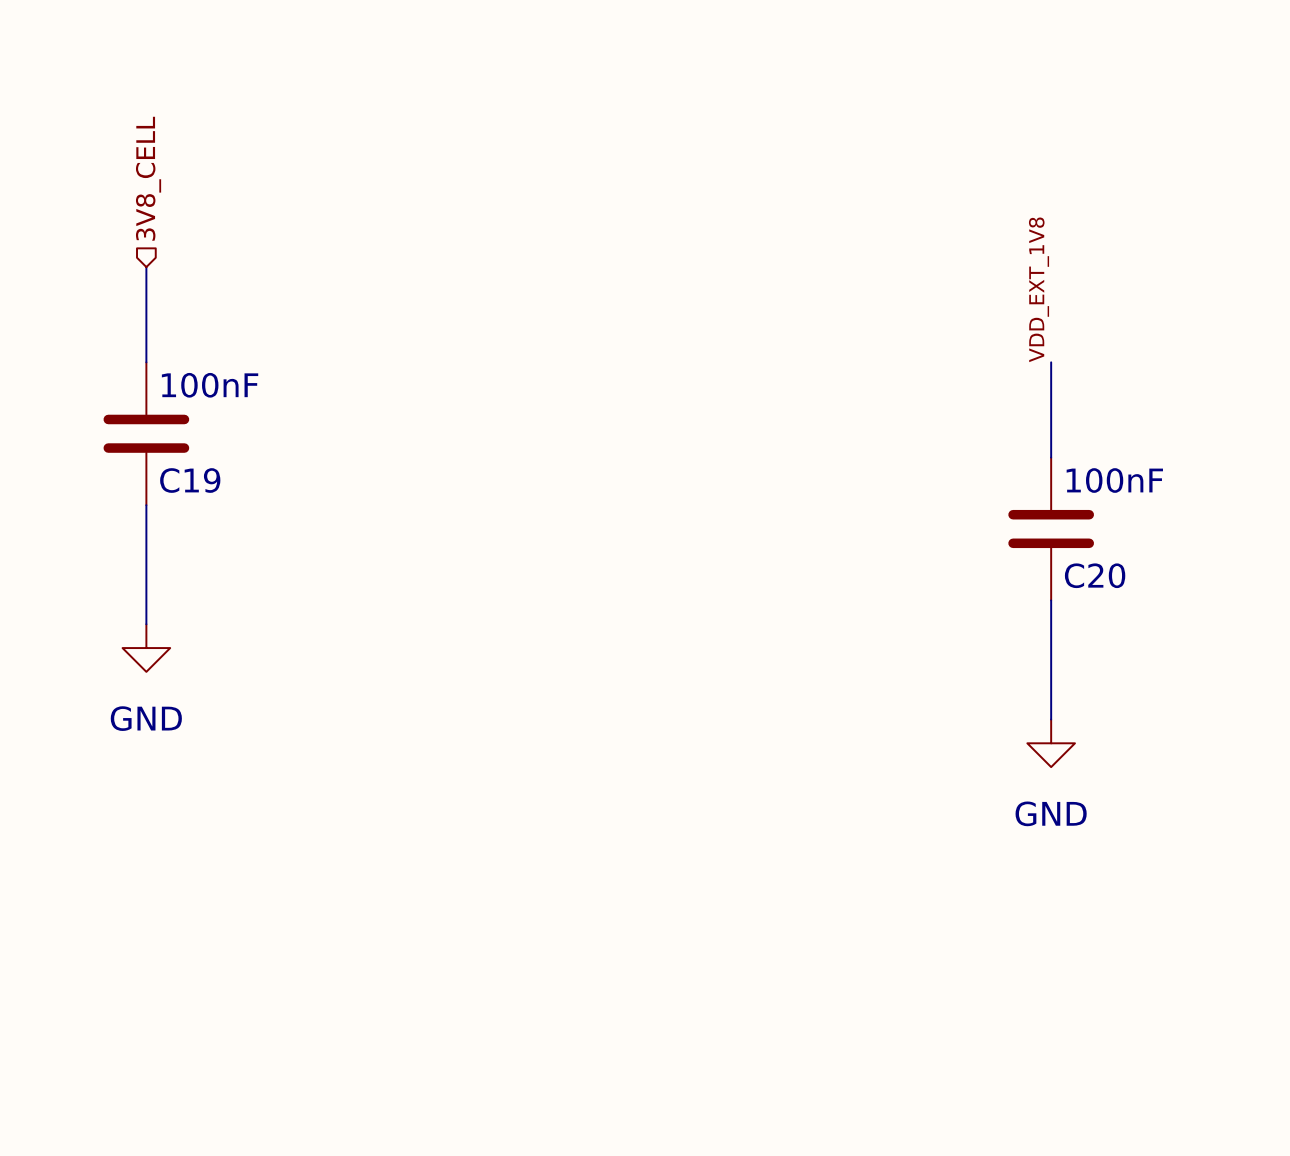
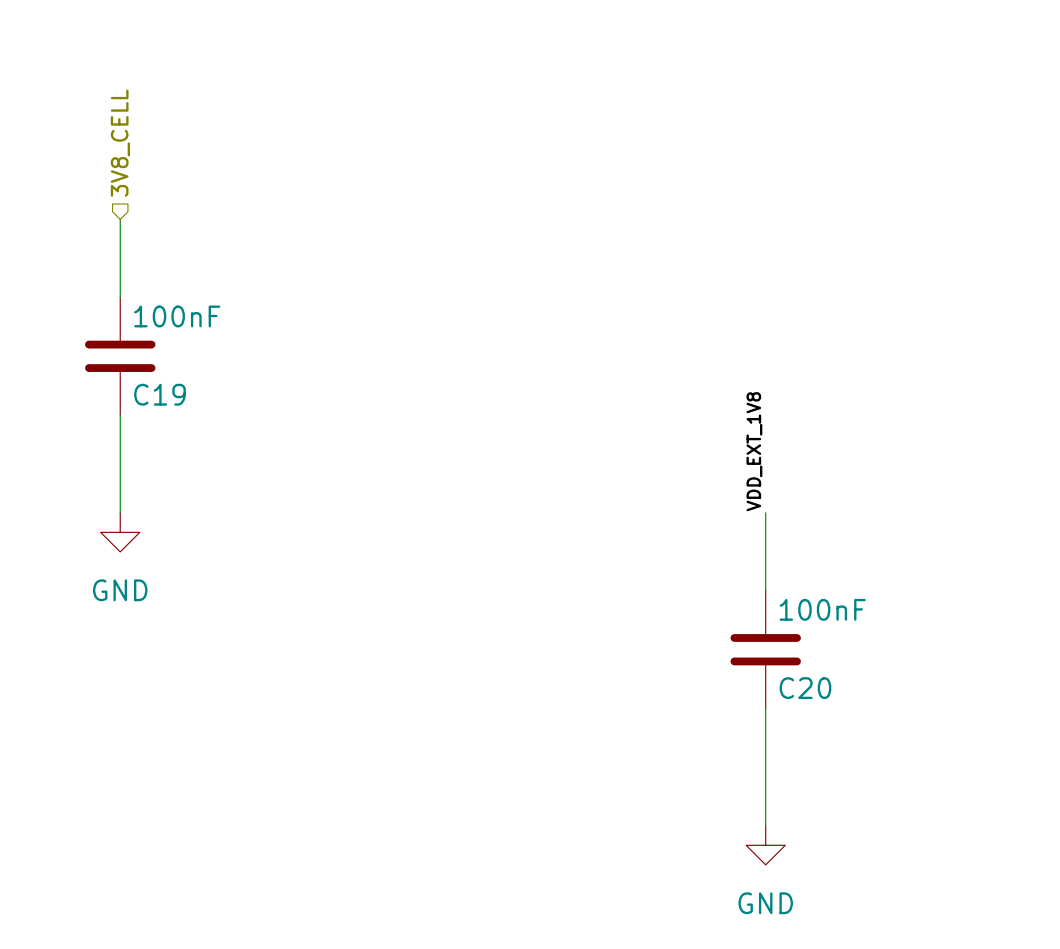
label position: VDD_EXT_1V8 (1039, 289) -> VDD_EXT_1V8 (754, 451)
wire: (1051, 362) (1051, 457) -> (765, 512) (765, 591)
C20 position: (1051, 529) -> (765, 649)
wire: (1051, 600) (1051, 719) -> none
power symbol position: GND (1051, 743) -> GND (765, 845)
wire: none -> (765, 708) (765, 825)

